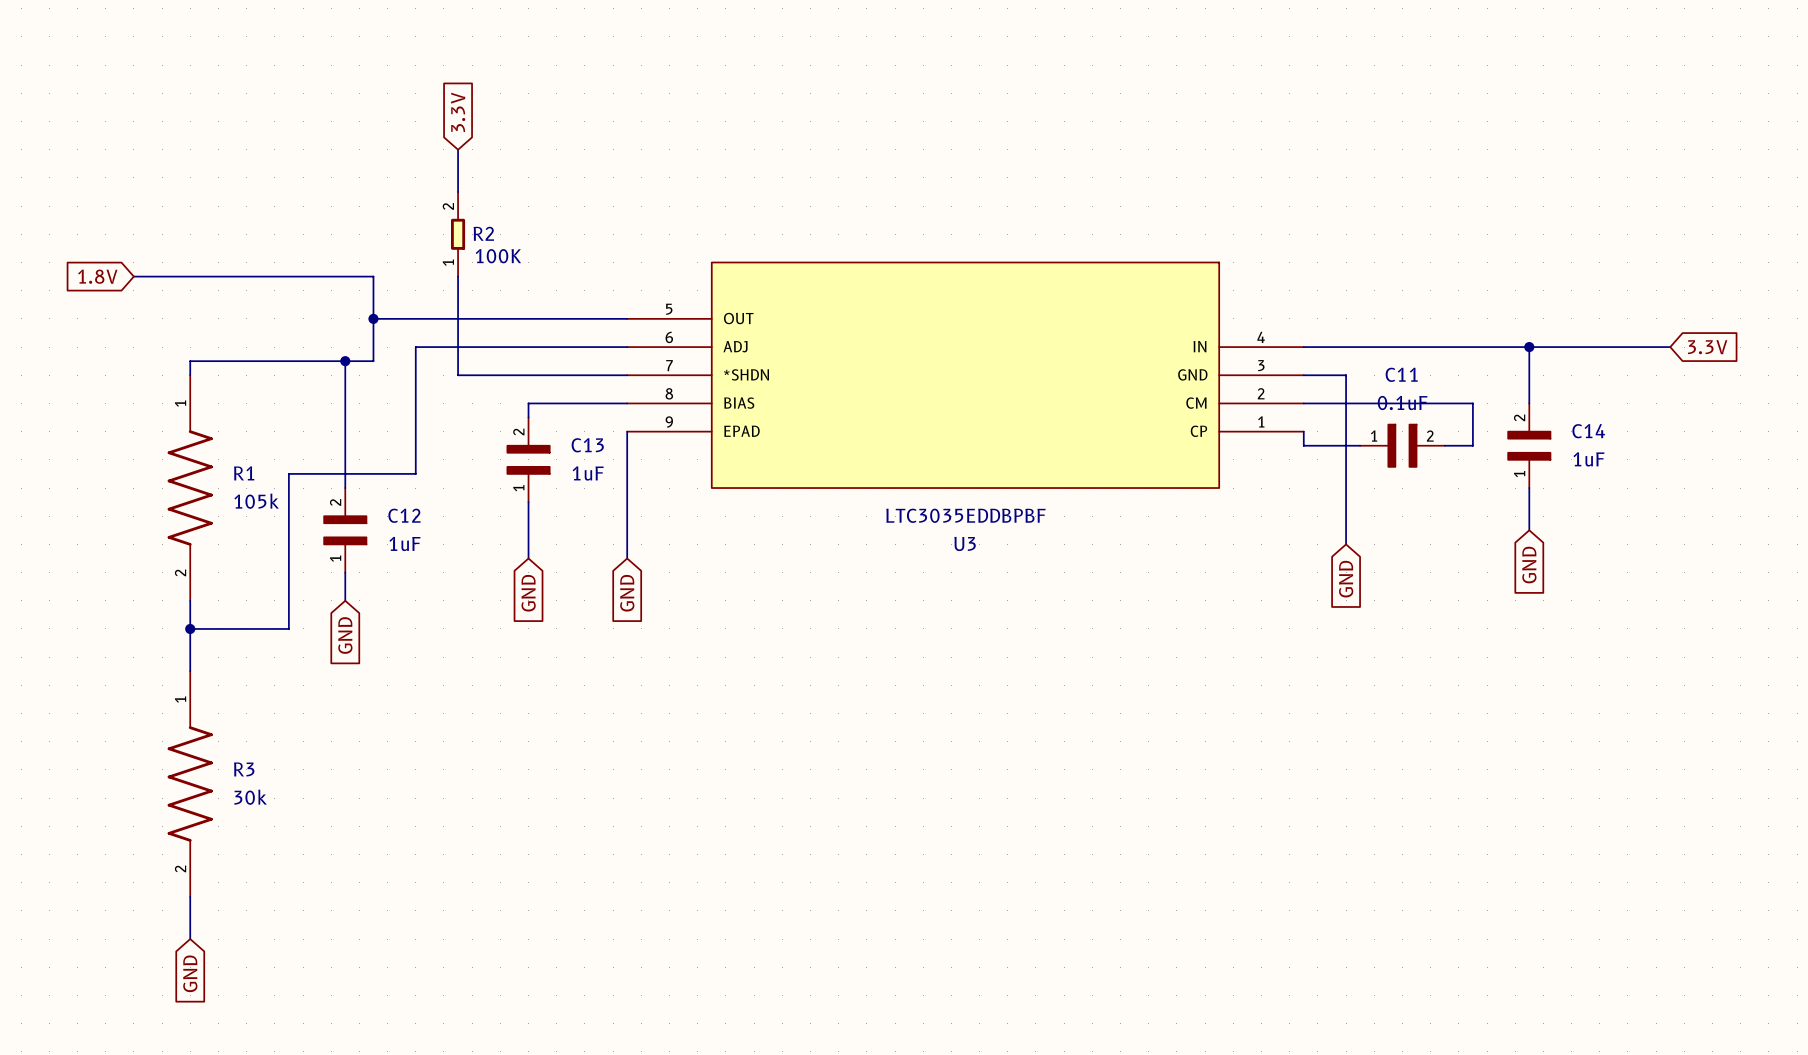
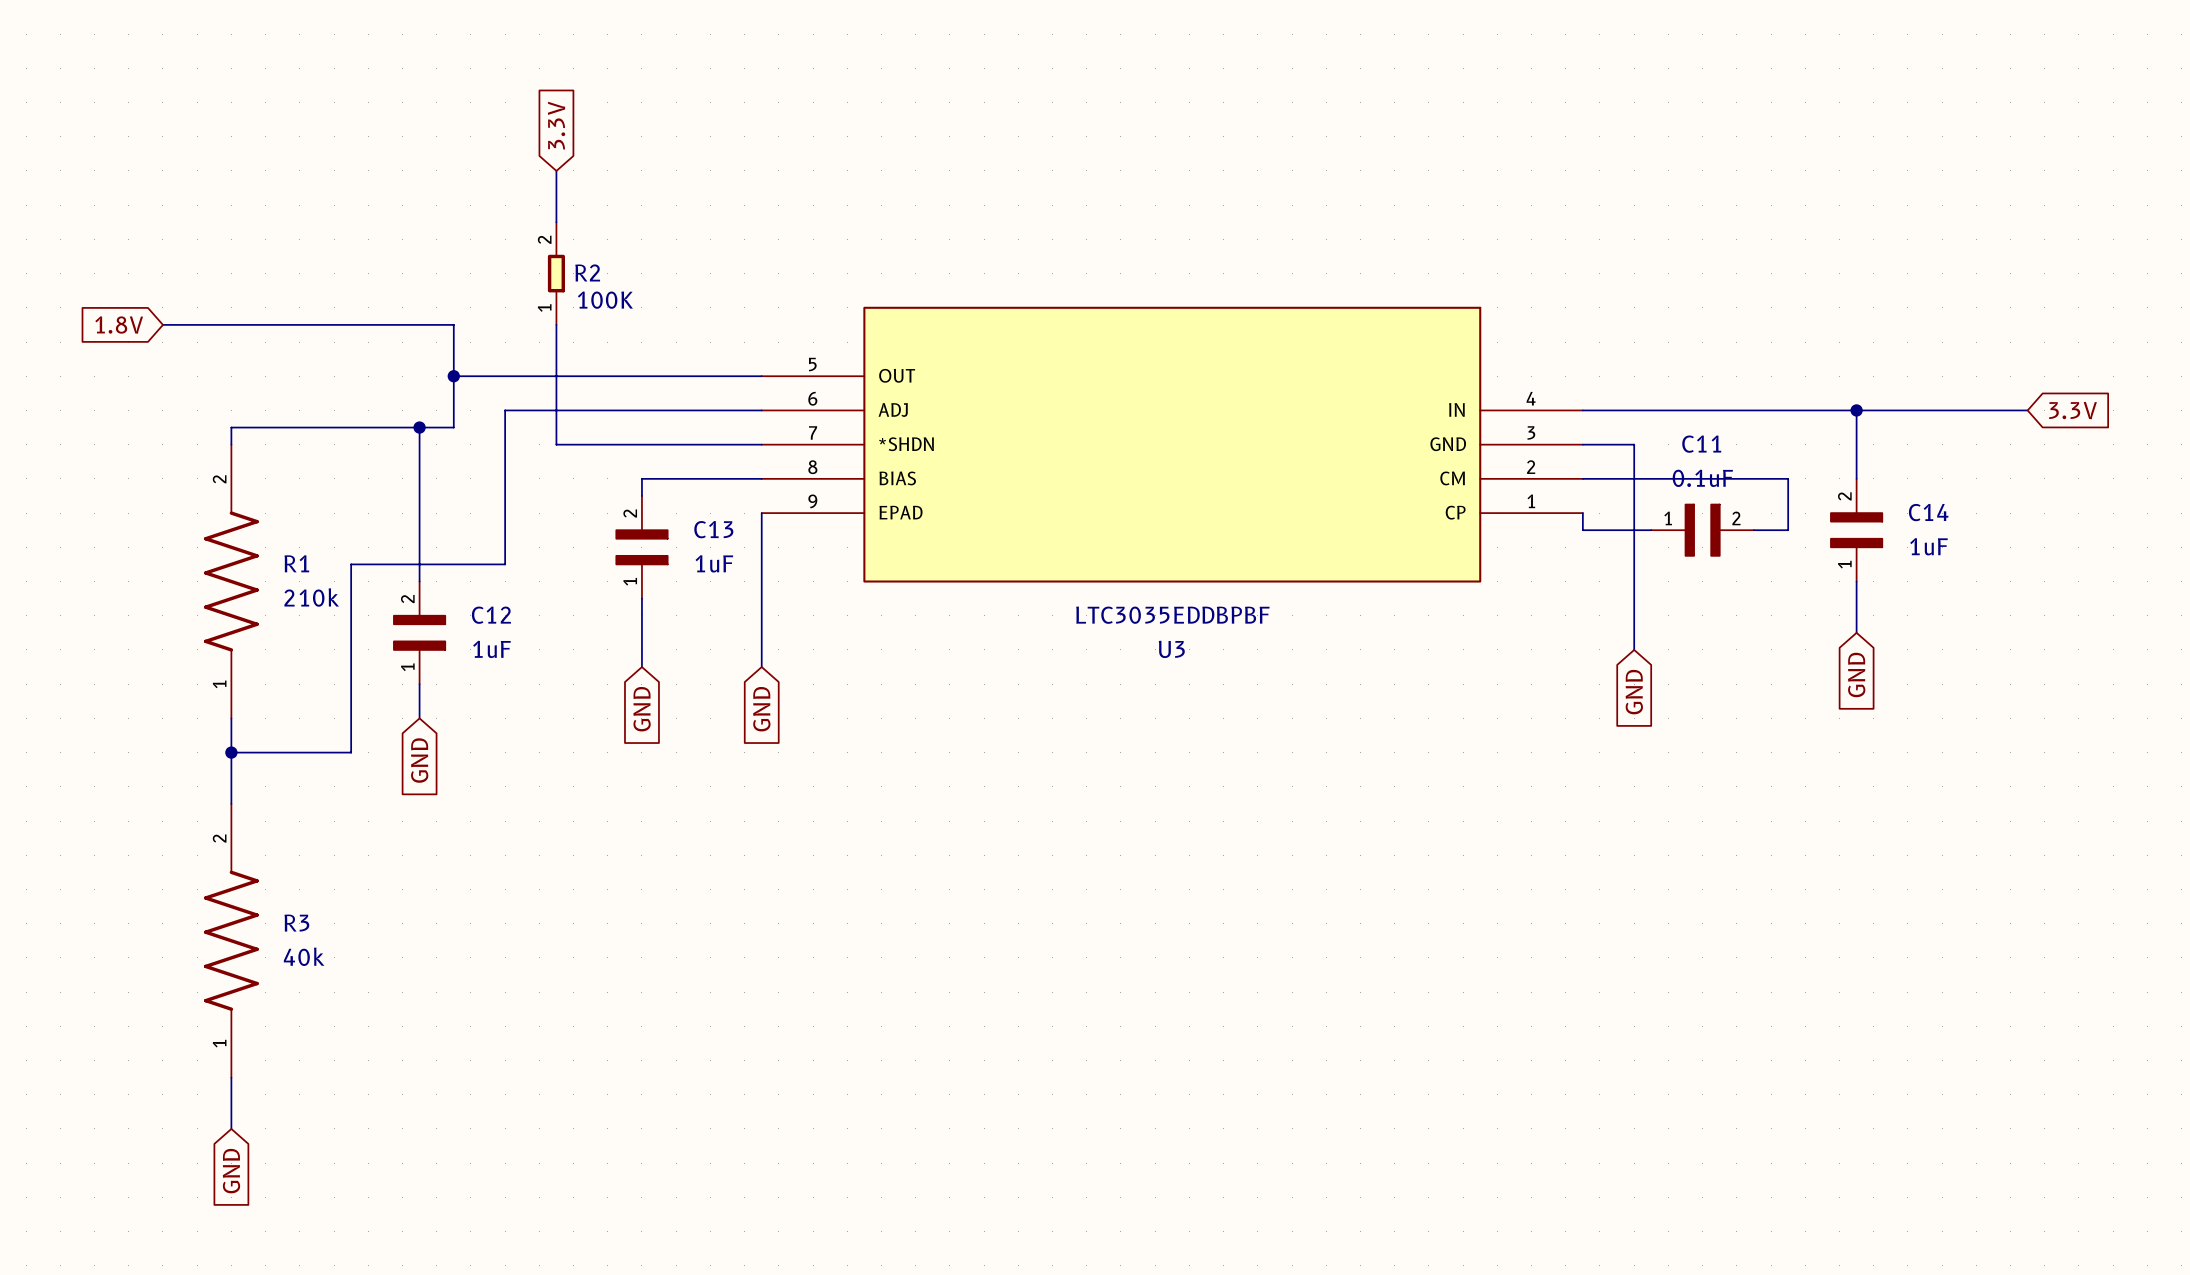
R1 rotation: 0° (190, 488) -> 180° (231, 581)
R1 value: 105k (256, 501) -> 210k (311, 597)
R3 rotation: 0° (190, 784) -> 180° (231, 940)
R3 value: 30k (250, 797) -> 40k (304, 956)

